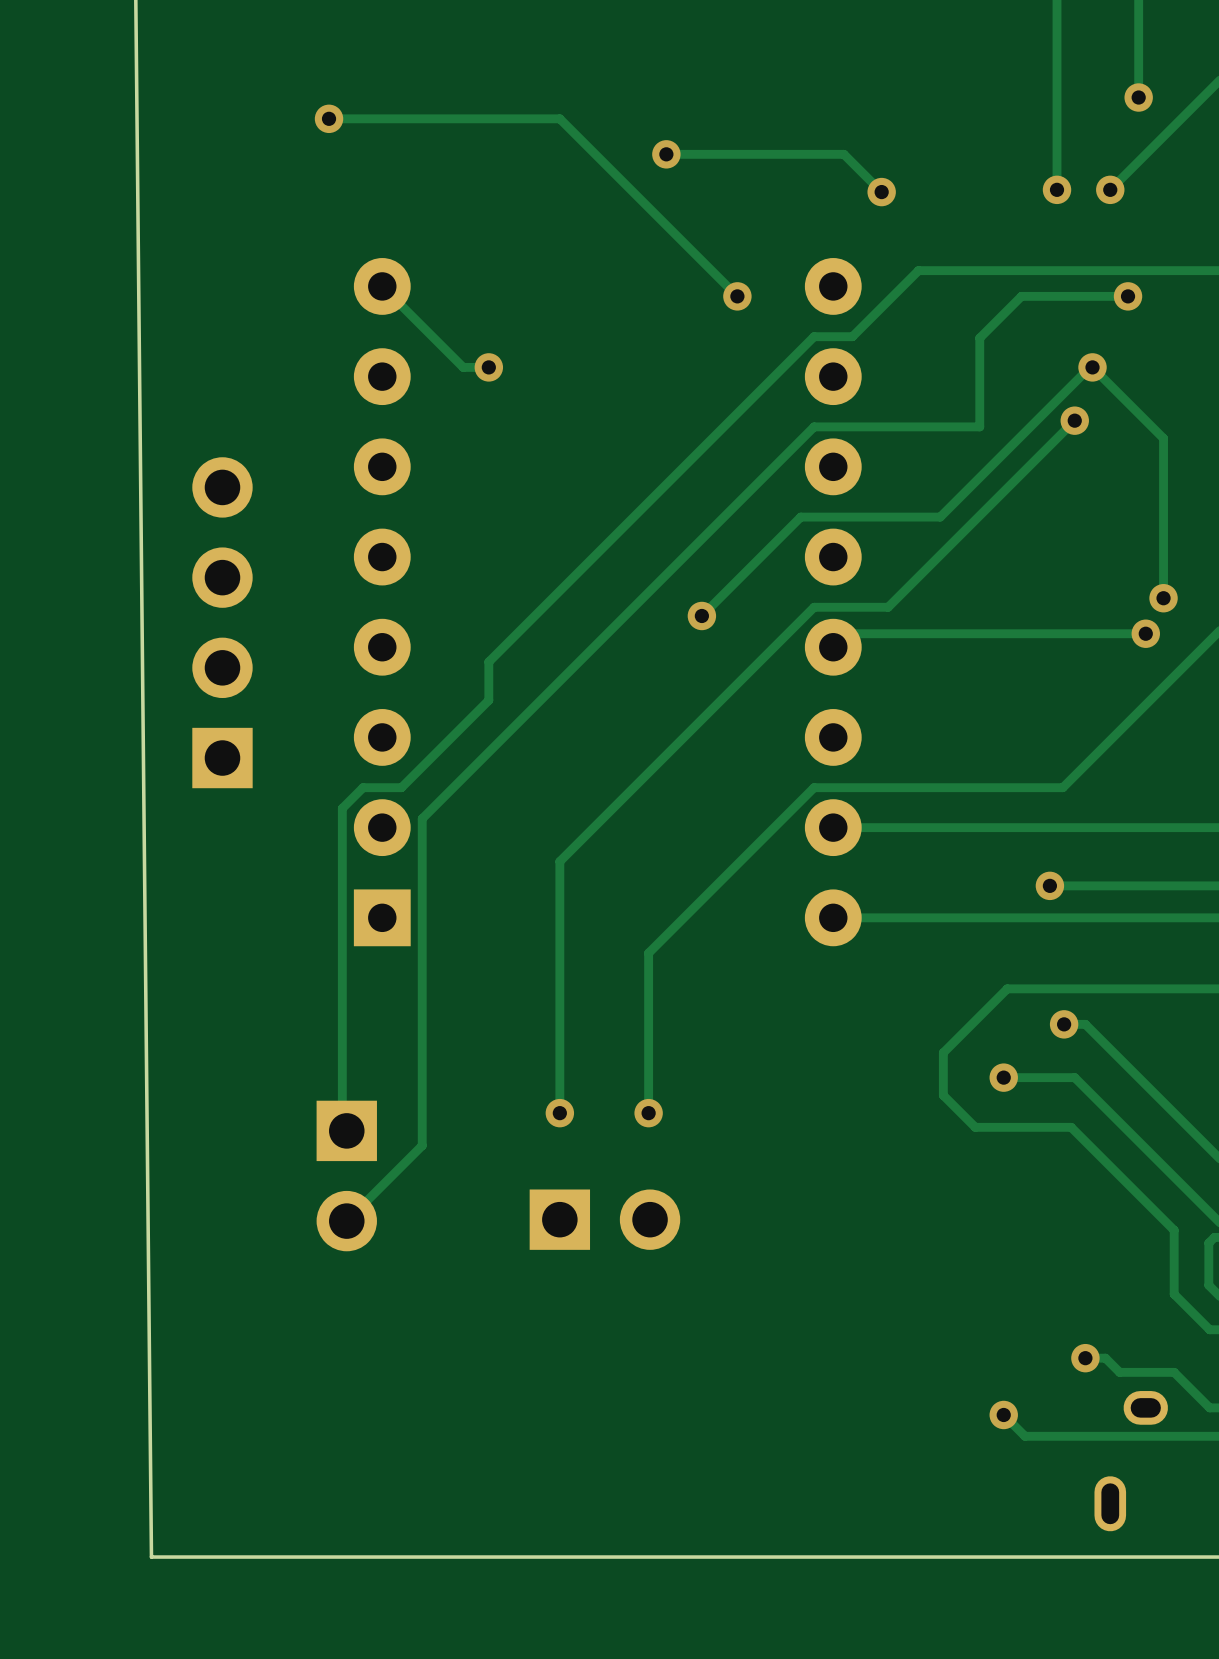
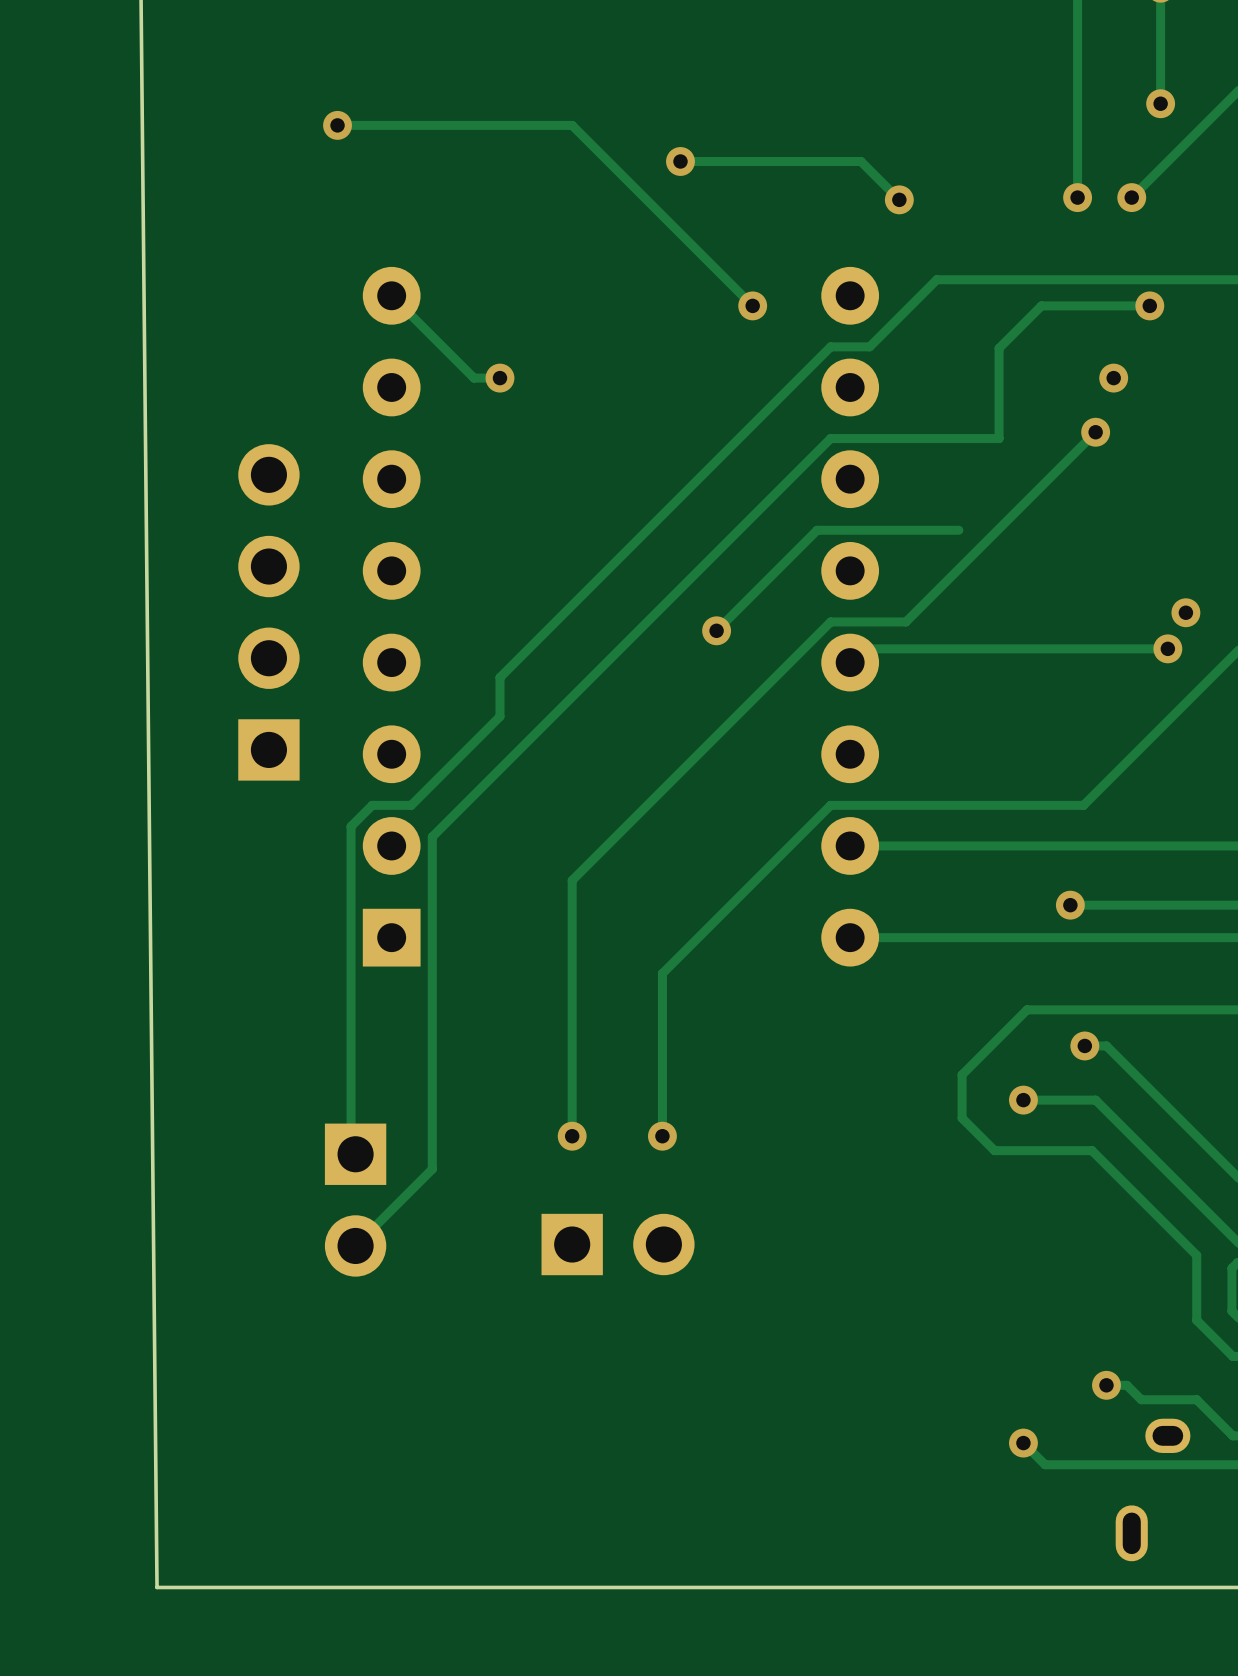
track: (1089, 367) (940, 517) -> none
track: (1092, 367) (1163, 438) (1163, 598) -> none
part position: (222, 622) -> (268, 612)

